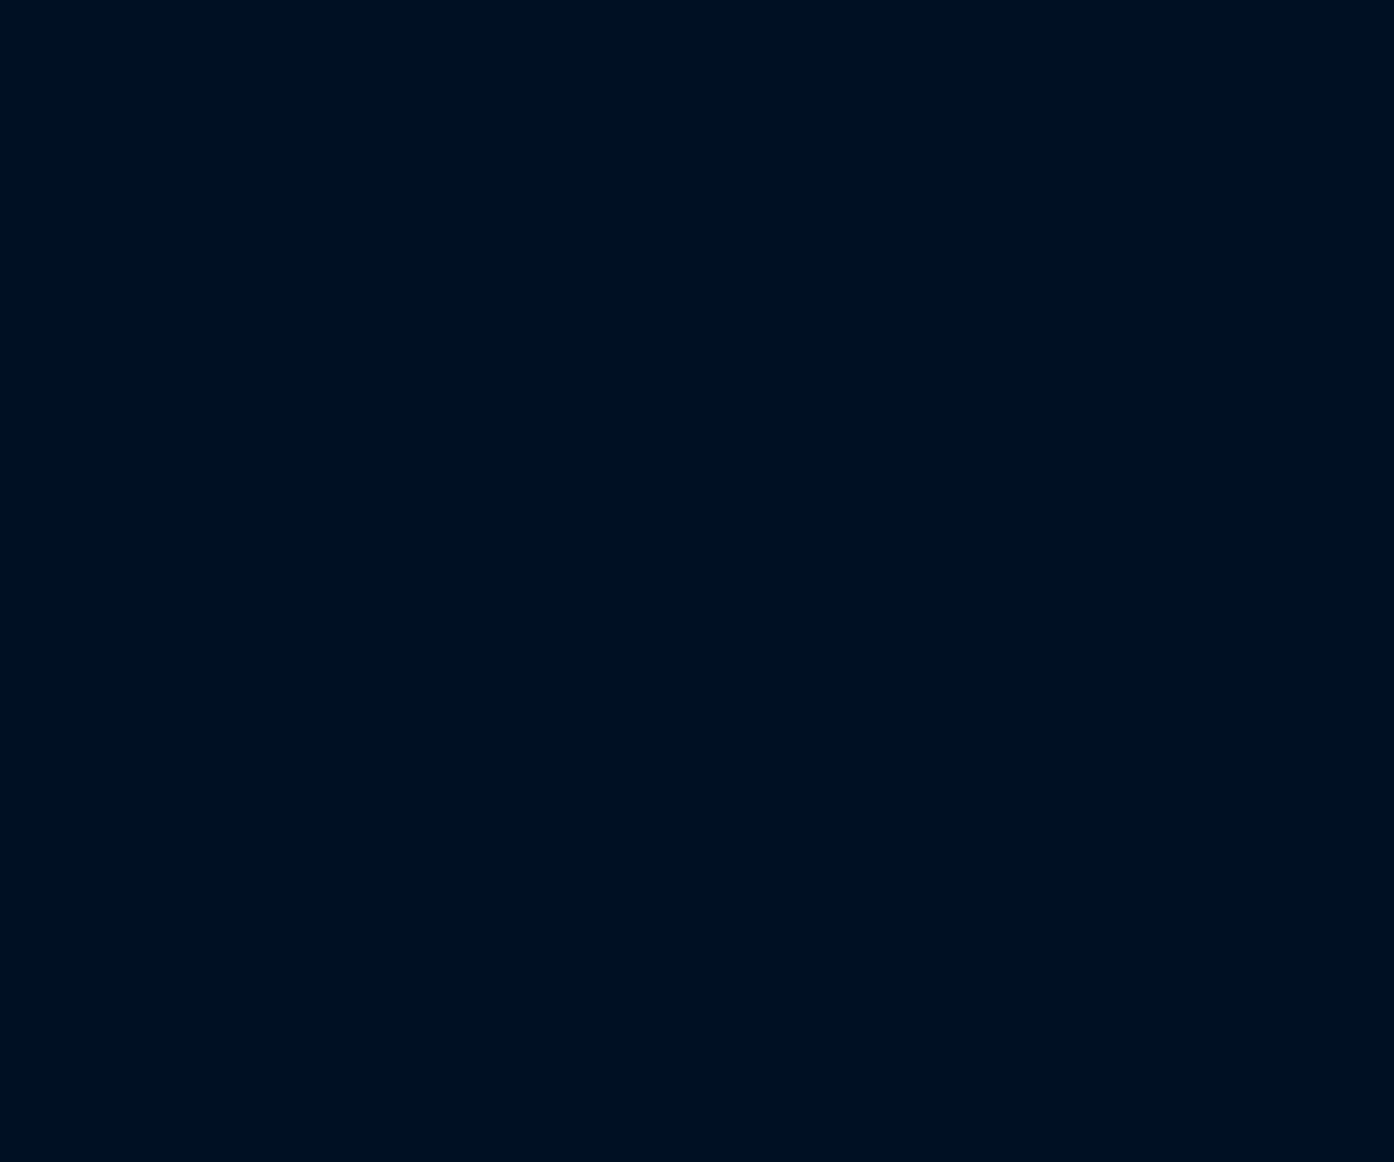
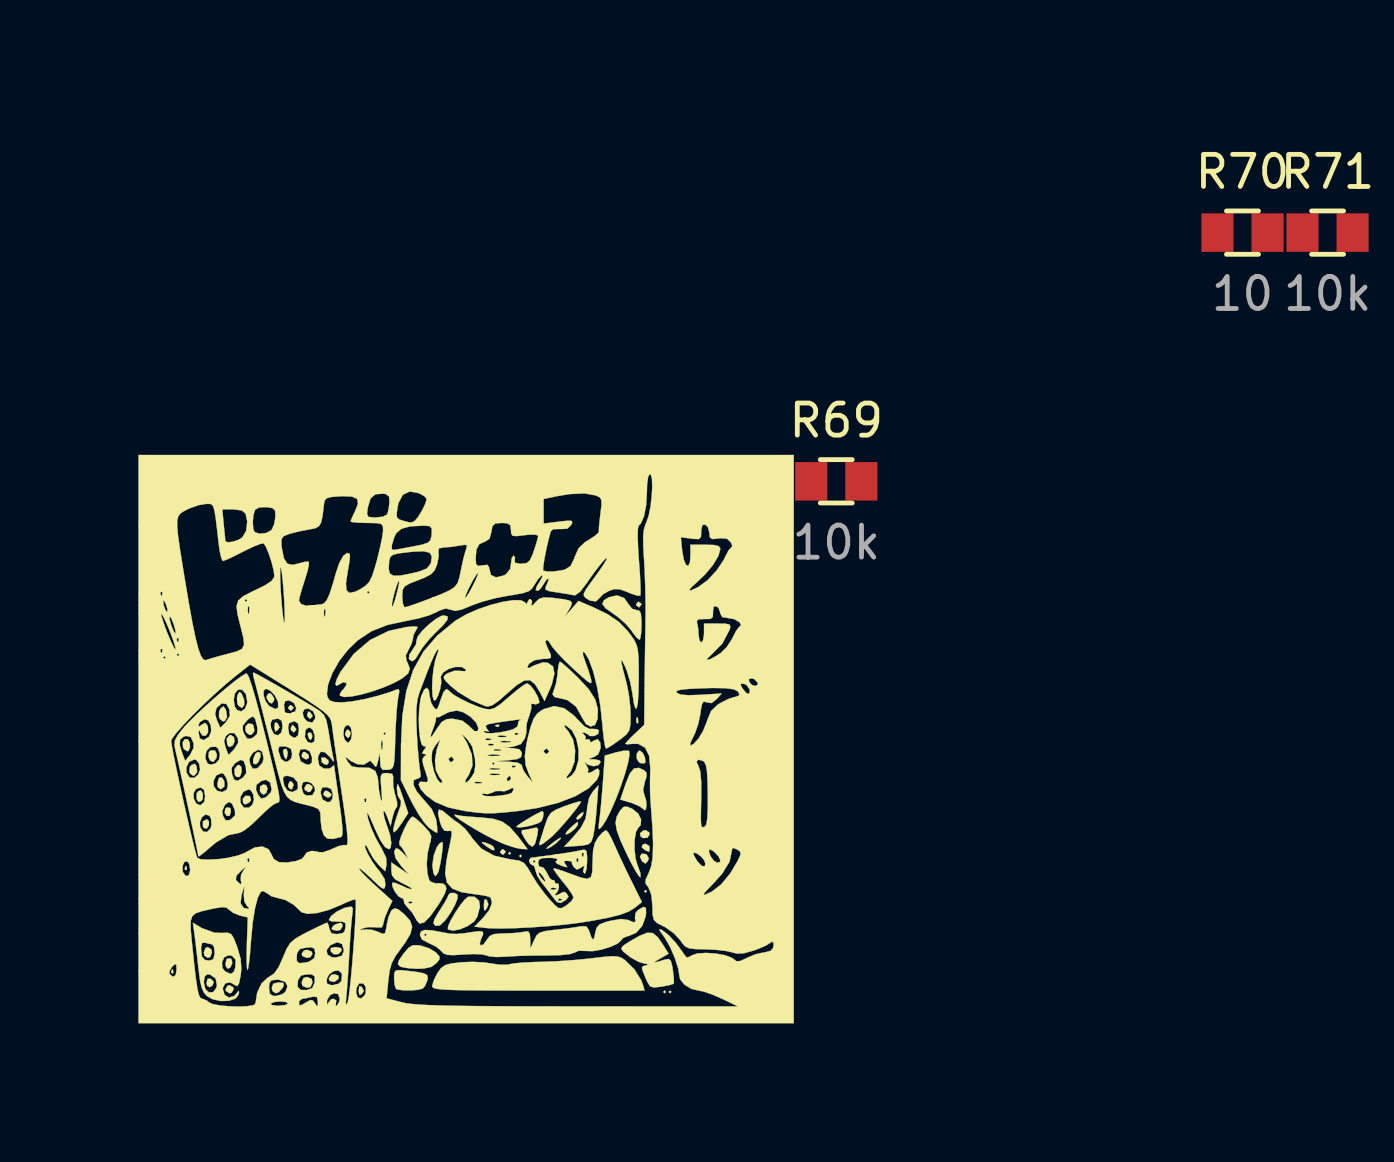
R70: none -> 10 (1242, 232)
R71: none -> 10k (1327, 232)
drawing: none -> [138, 454, 794, 1024]
R69: none -> 10k (836, 481)

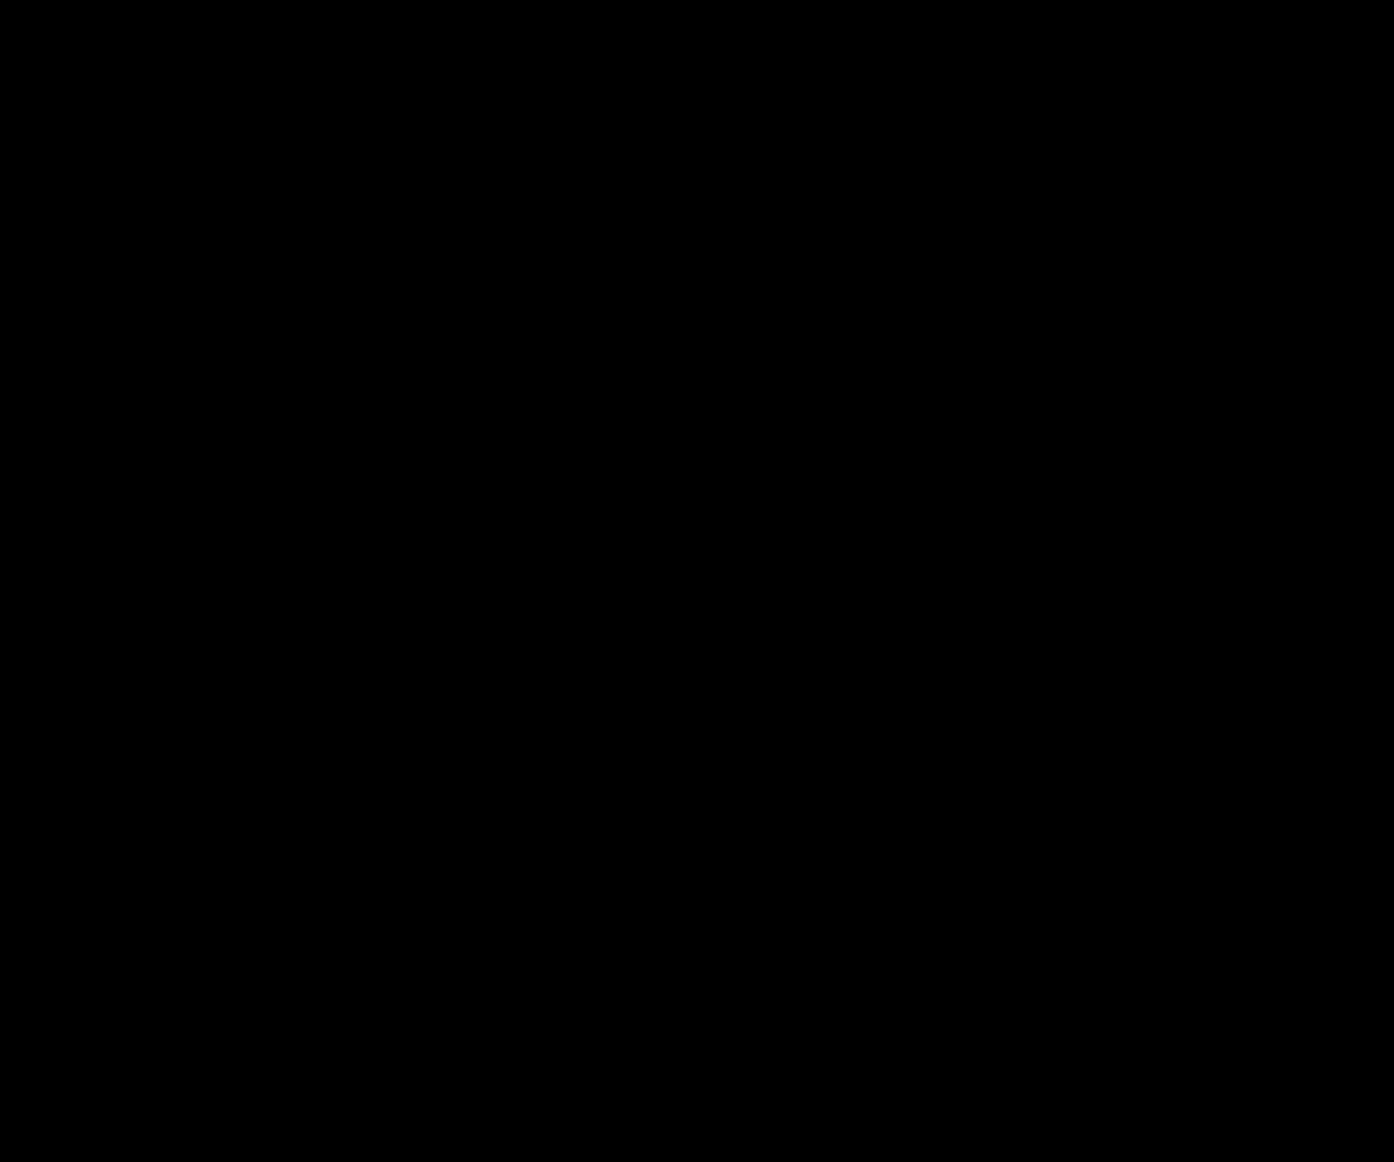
R70: 10 (1242, 232) -> none
R71: 10k (1327, 232) -> none
drawing: [138, 454, 794, 1024] -> none
R69: 10k (836, 481) -> none

